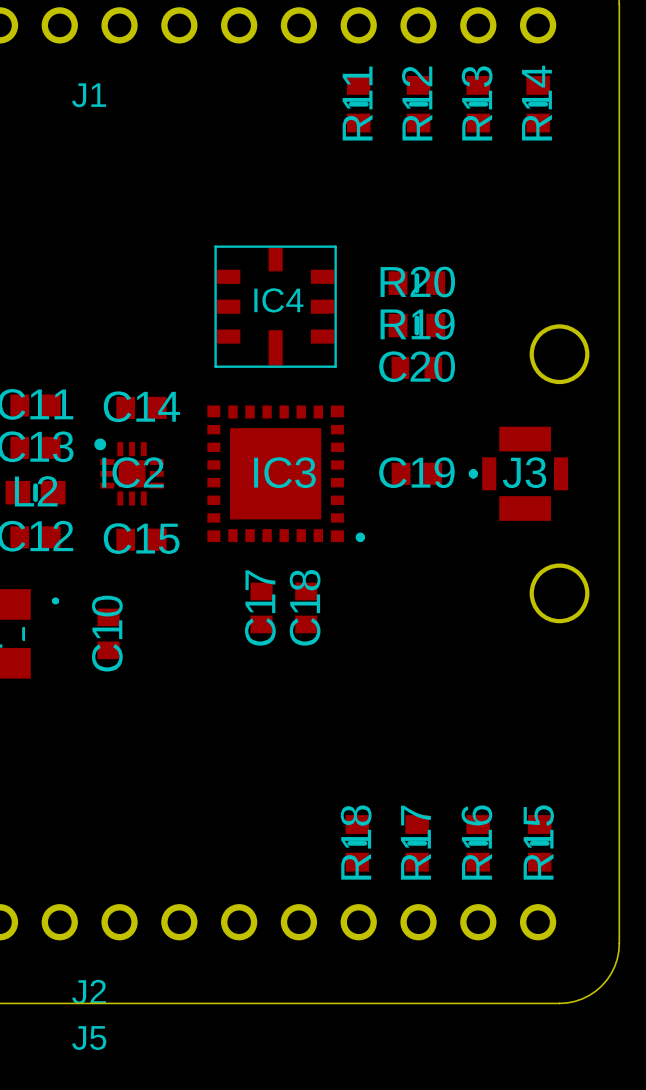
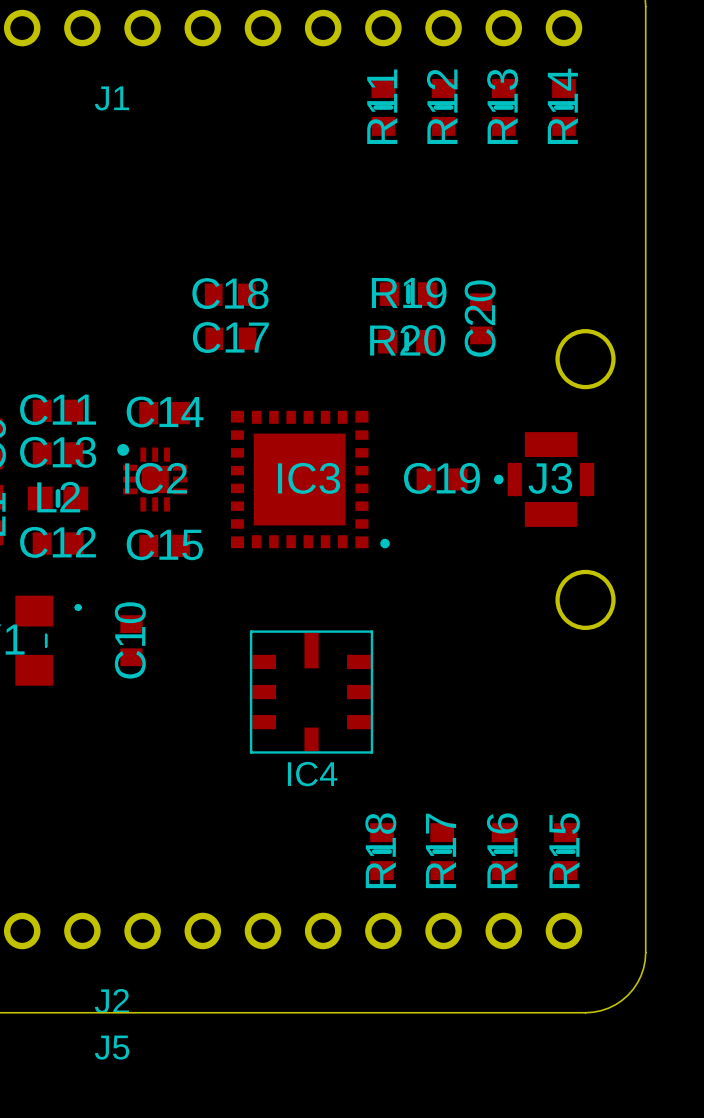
R20 position: (416, 283) -> (406, 341)
IC4 name position: IC4 (278, 300) -> IC4 (312, 774)
IC4 rotation: 0° (275, 306) -> 180° (311, 692)
IC4 position: (275, 306) -> (311, 692)
R19 position: (416, 325) -> (408, 294)
C20 rotation: 0° (416, 367) -> 90° clockwise (481, 318)
C20 position: (416, 367) -> (481, 318)
C17 rotation: 0° (261, 607) -> 90° clockwise (230, 338)
C17 position: (261, 607) -> (230, 338)
C18 rotation: 0° (306, 607) -> 90° clockwise (230, 294)
C18 position: (306, 607) -> (230, 294)

